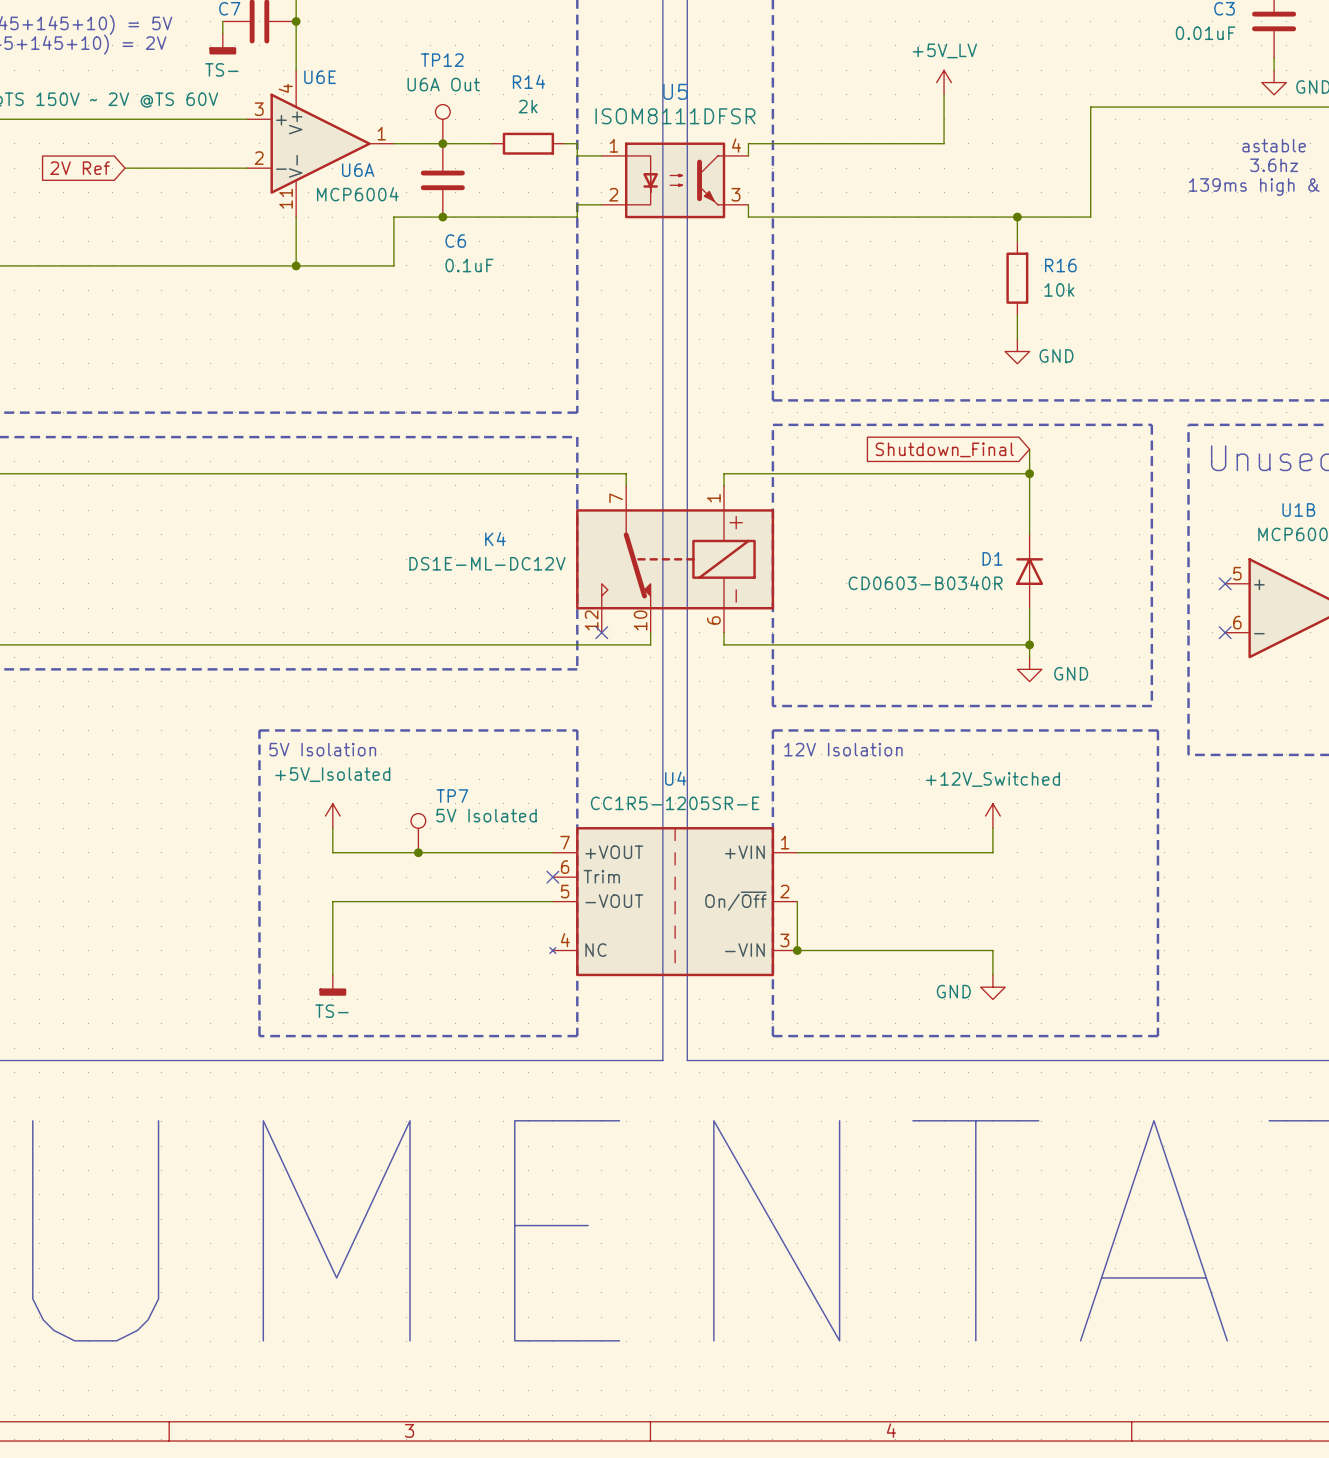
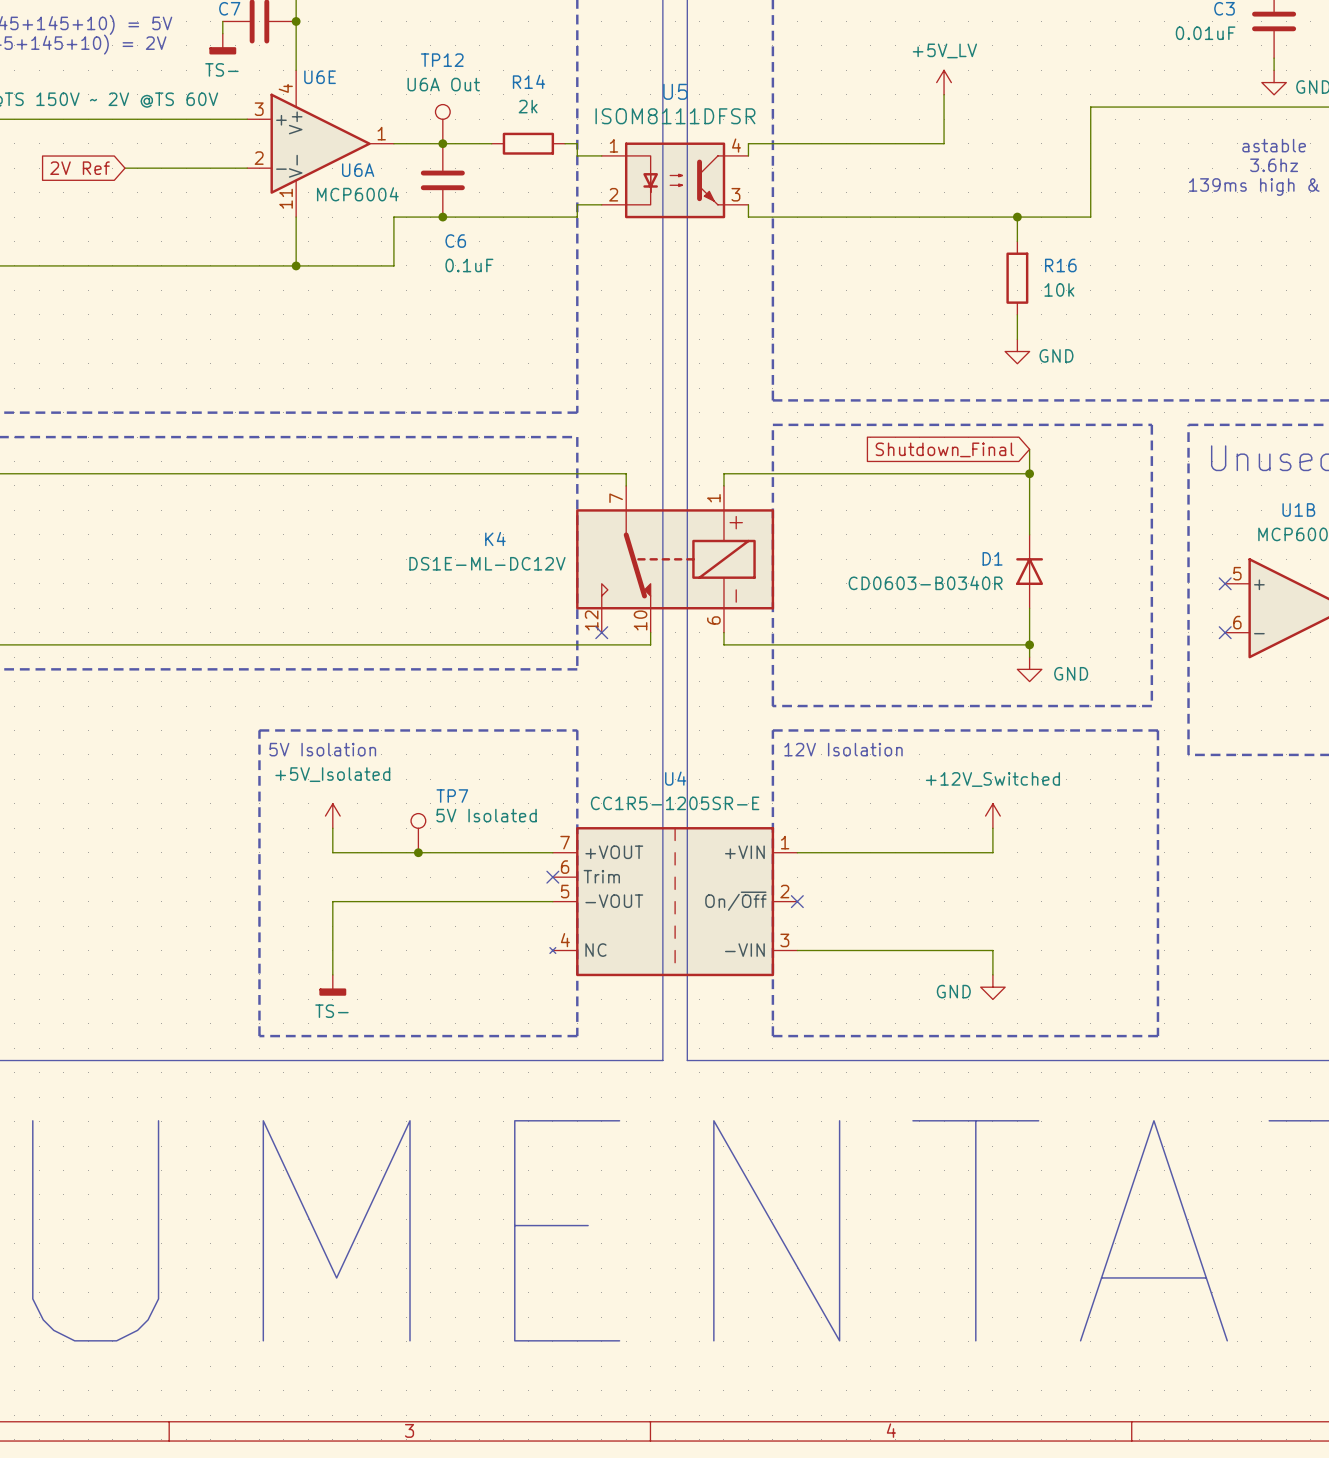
wire: (797, 901) (797, 950) -> none
no-connect mark: none -> (797, 901)
junction: (797, 950) -> none

